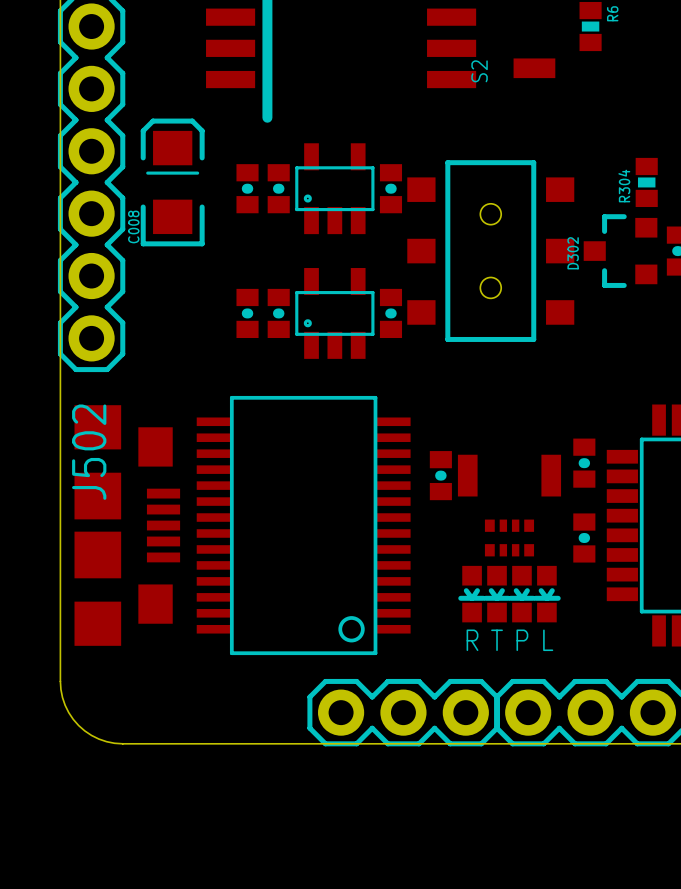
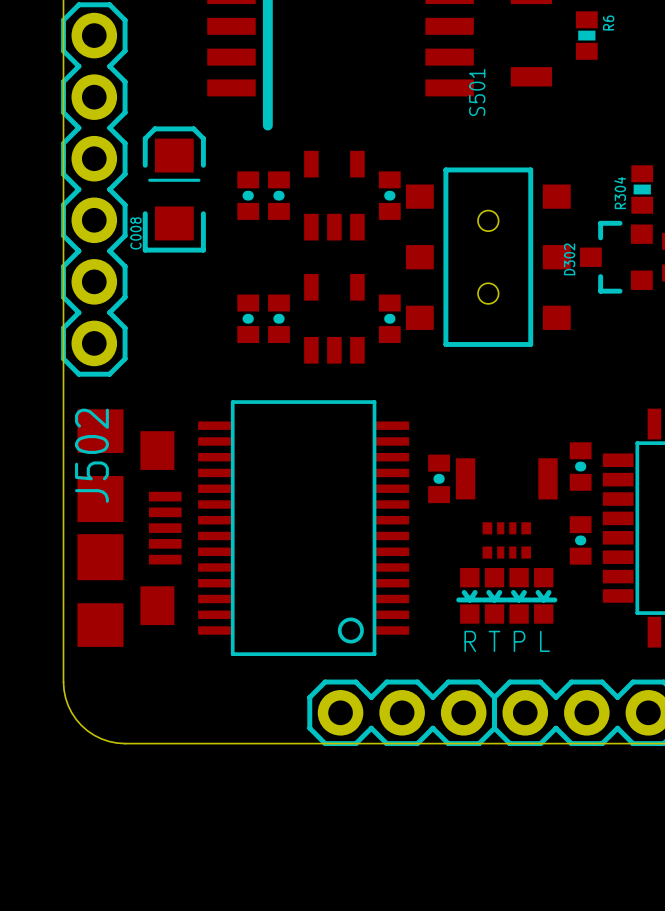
S2 name: S2 (479, 71) -> S501 (477, 92)
part footprint: [295, 143, 375, 235] -> [304, 150, 365, 241]
part footprint: [295, 268, 375, 359] -> [304, 273, 365, 364]

